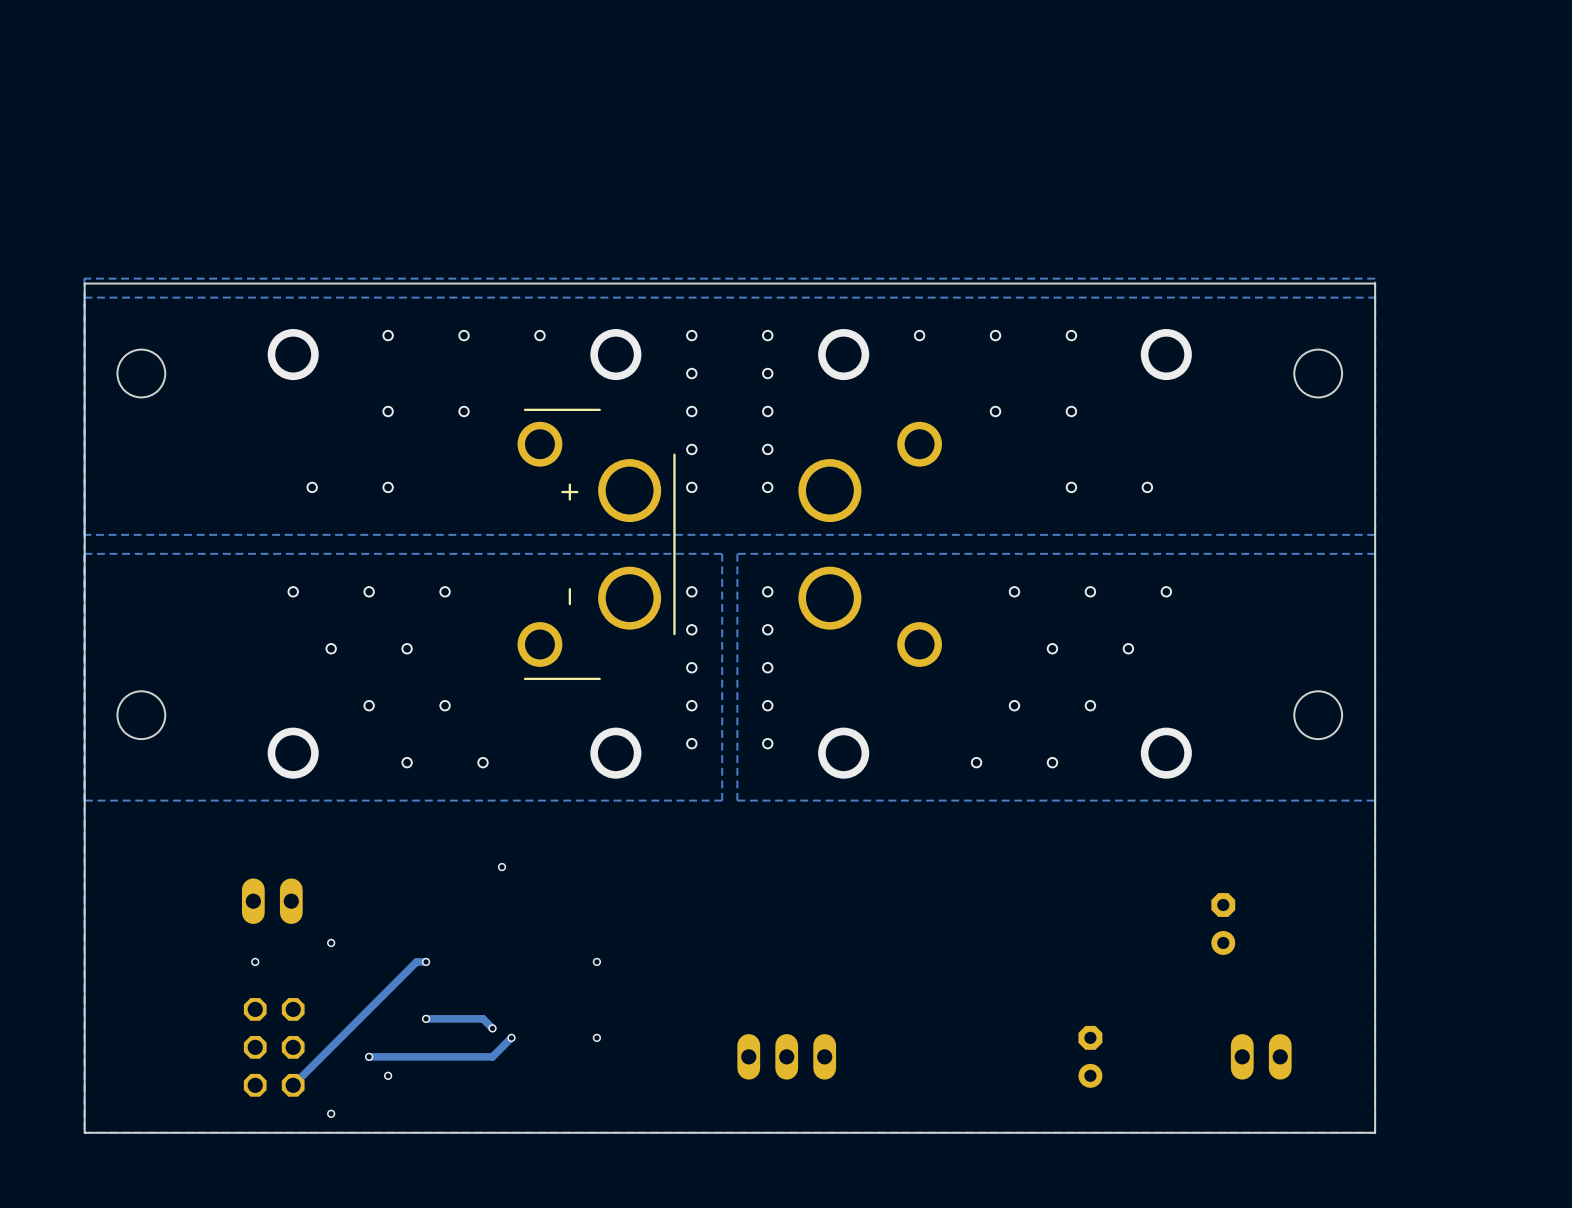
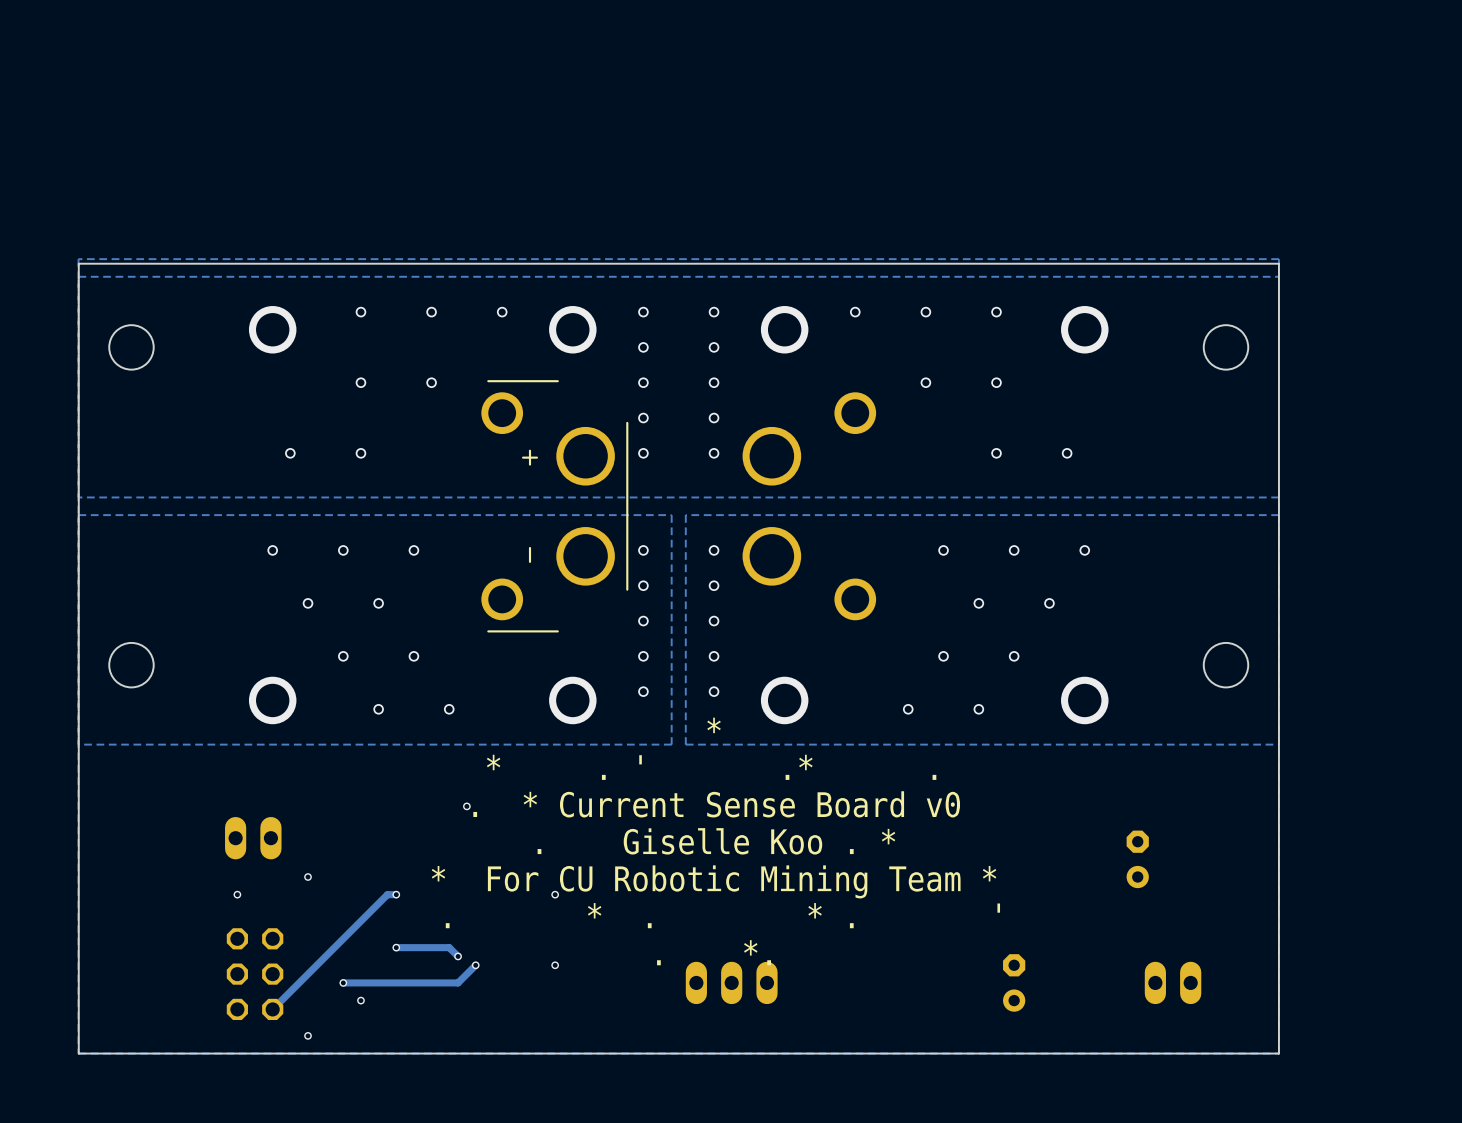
text: none -> * (714, 725)
text: none -> * . ' .* . (711, 767)
text: none -> . * Current Sense Board v0 (716, 804)
text: none -> . Giselle Koo . * (716, 841)
text: none -> * For CU Robotic Mining Team * (714, 881)
text: none -> . * . * . ' (722, 915)
text: none -> . *. (714, 952)

